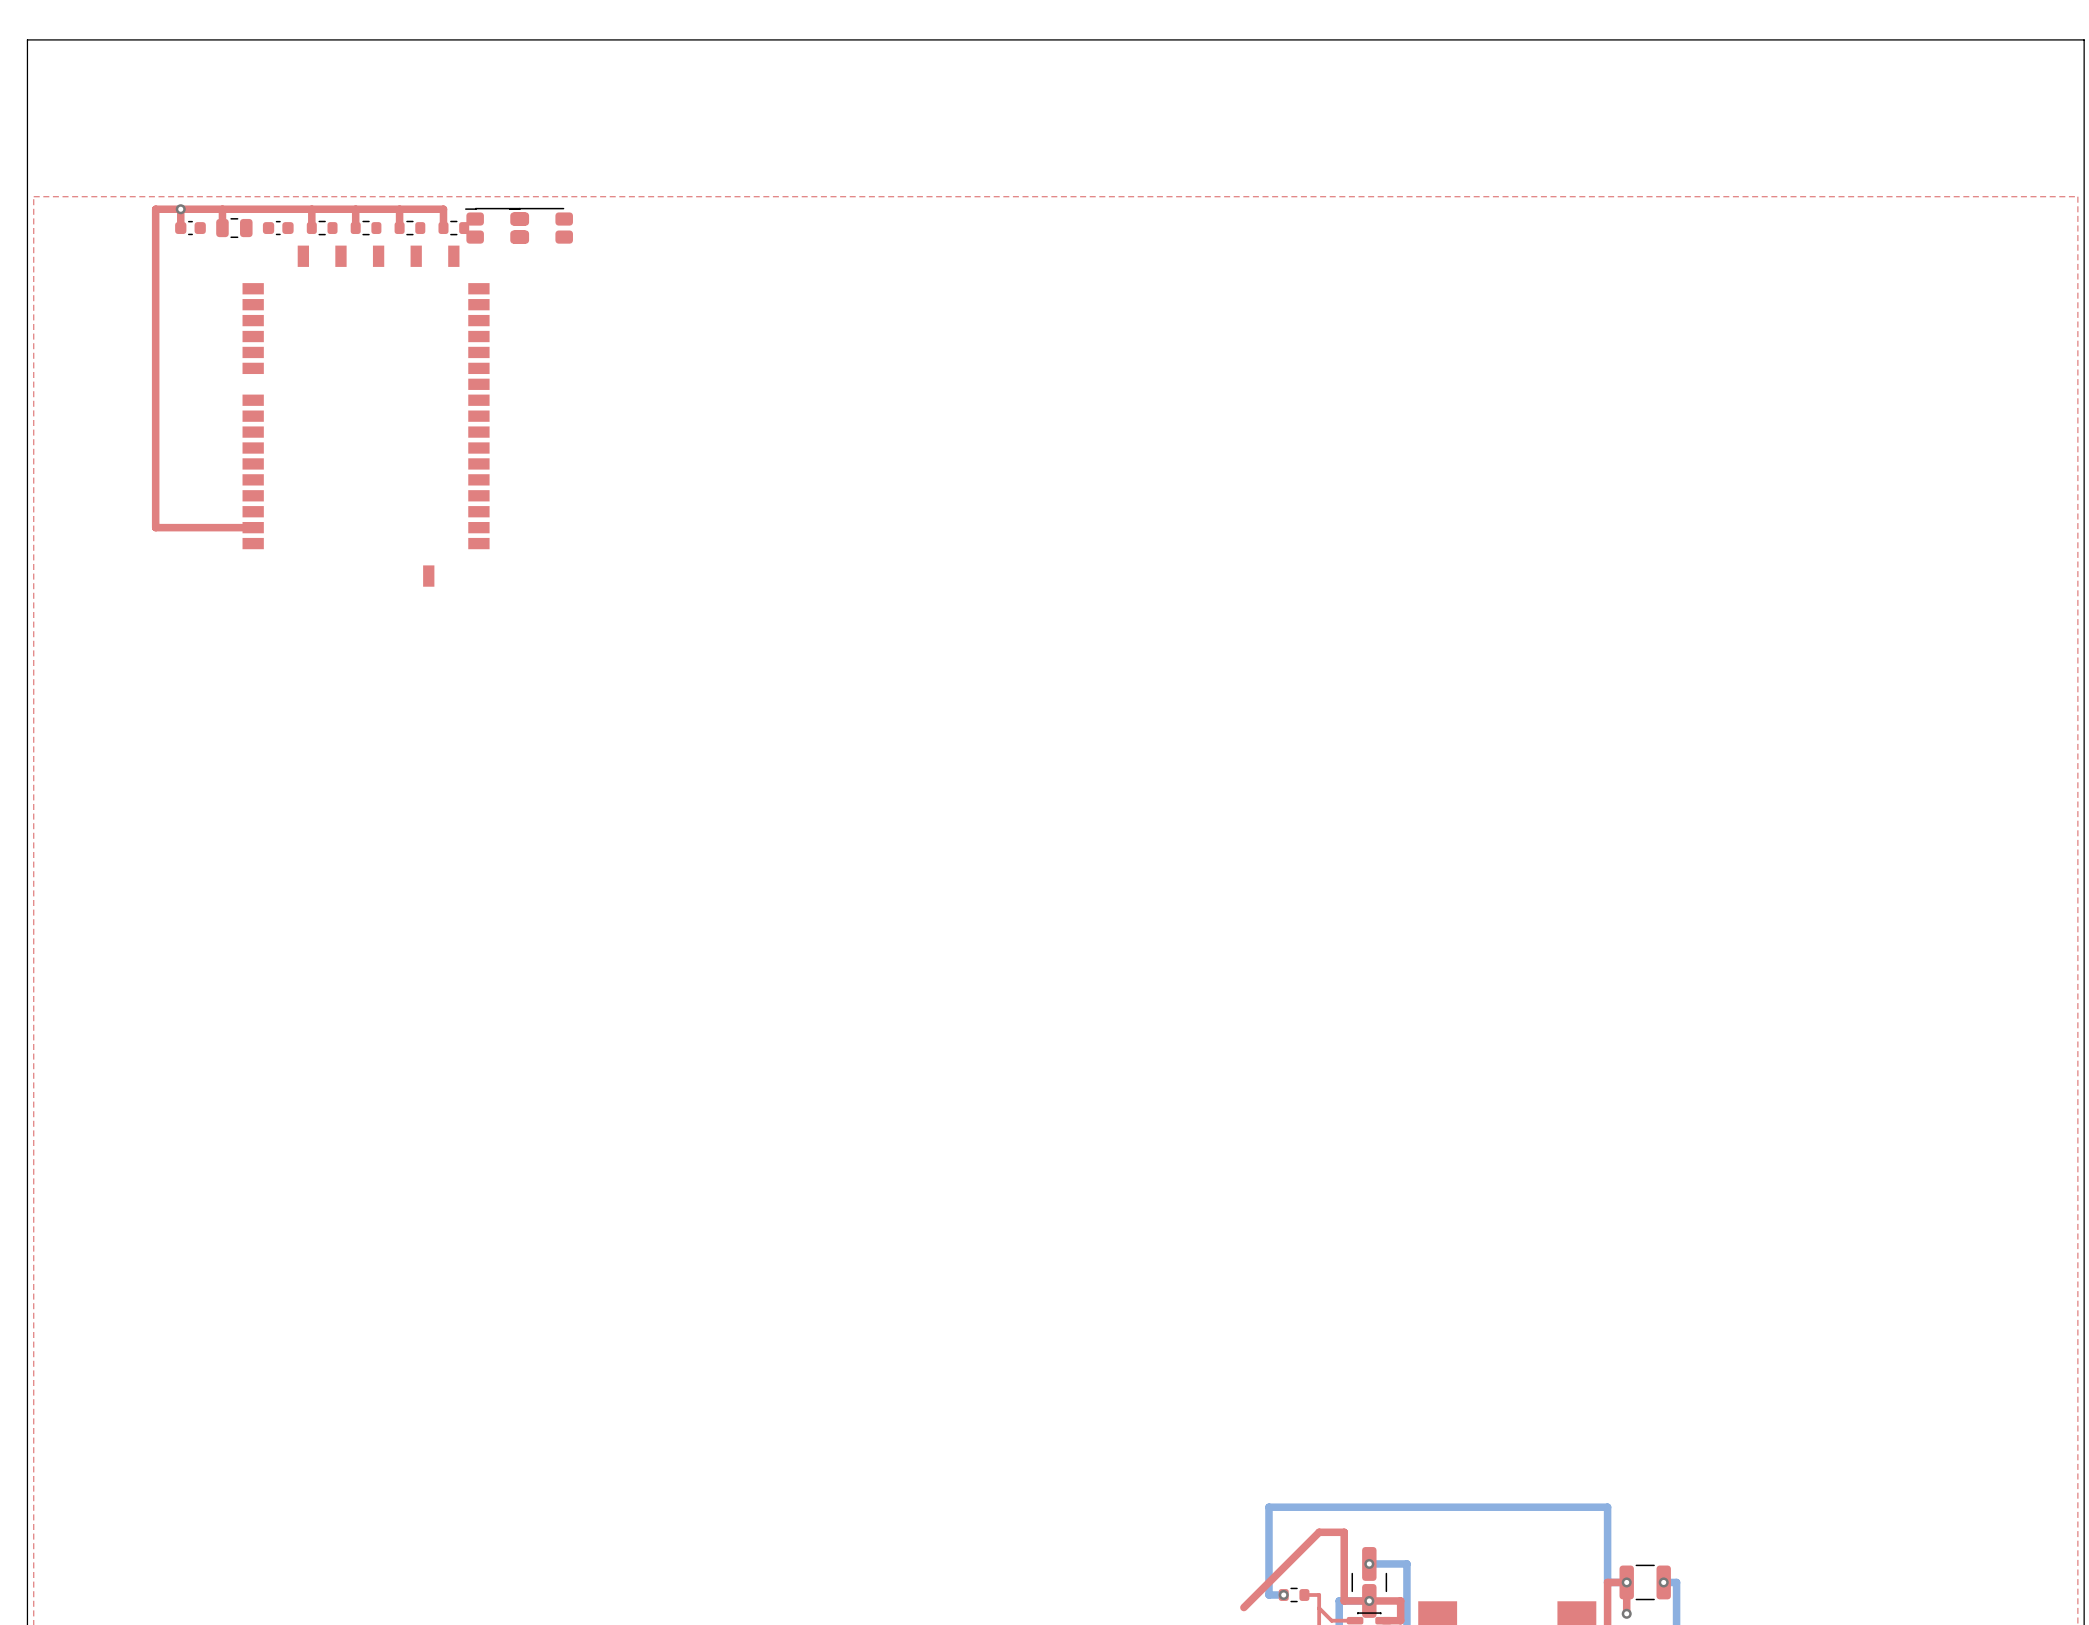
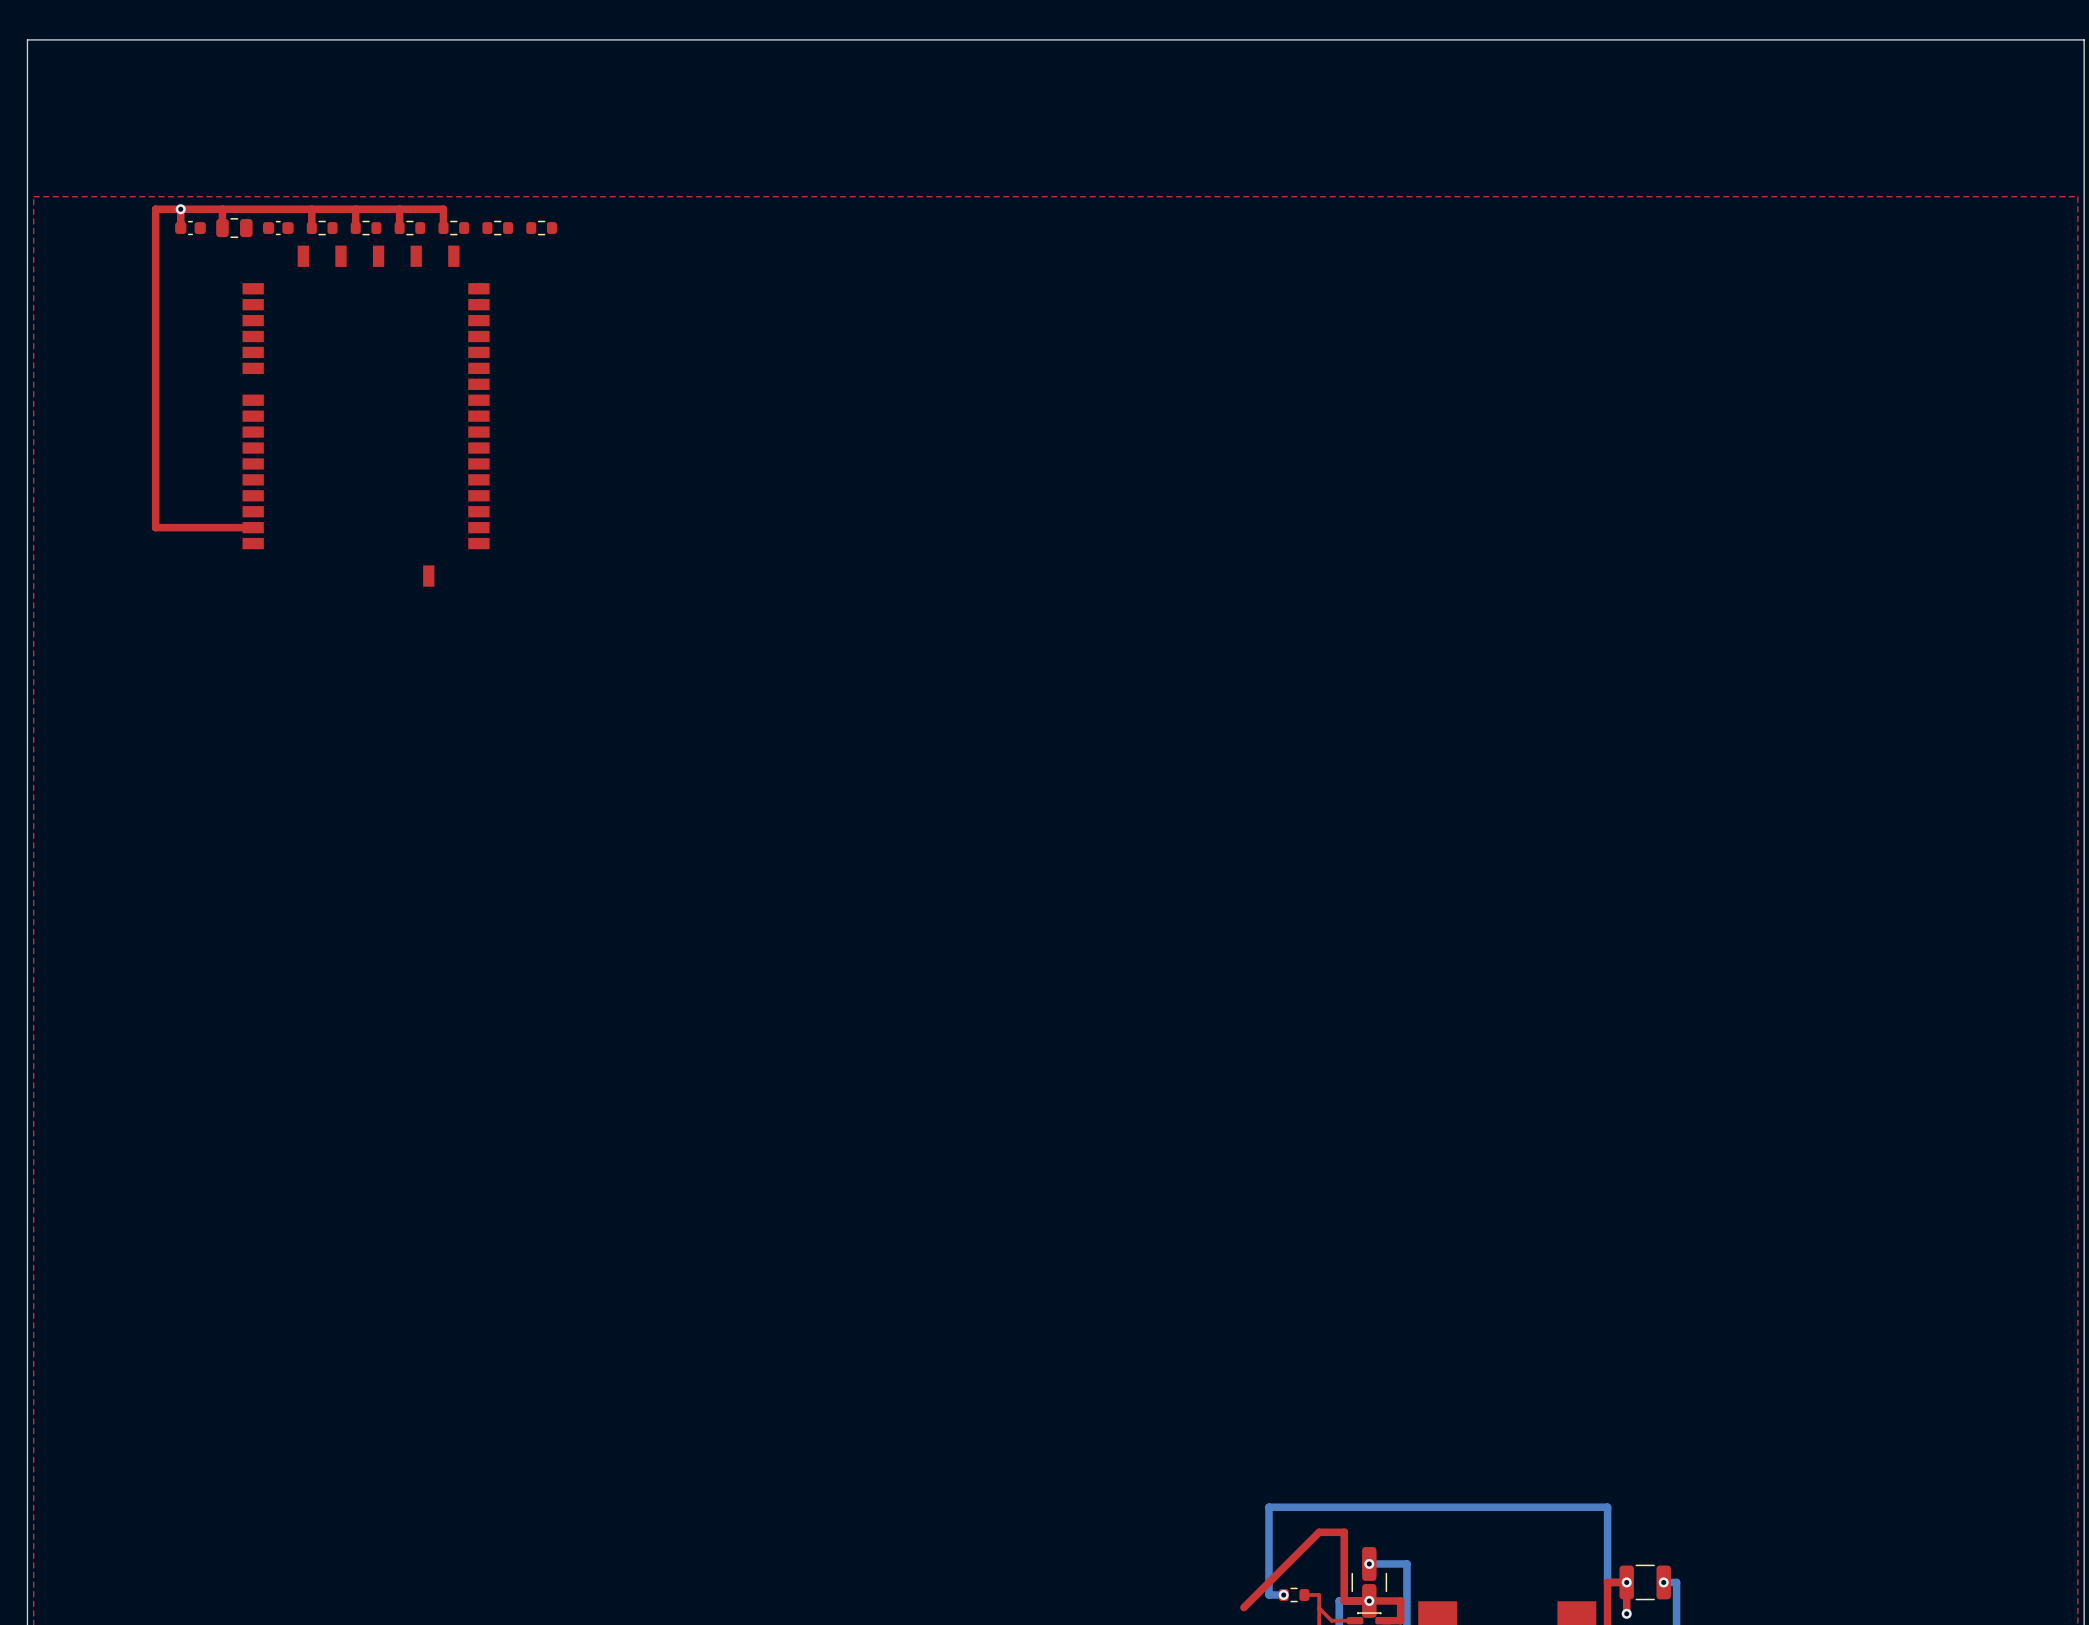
part footprint: [464, 207, 530, 244] -> [482, 220, 514, 236]
part footprint: [508, 207, 573, 244] -> [526, 220, 557, 236]

